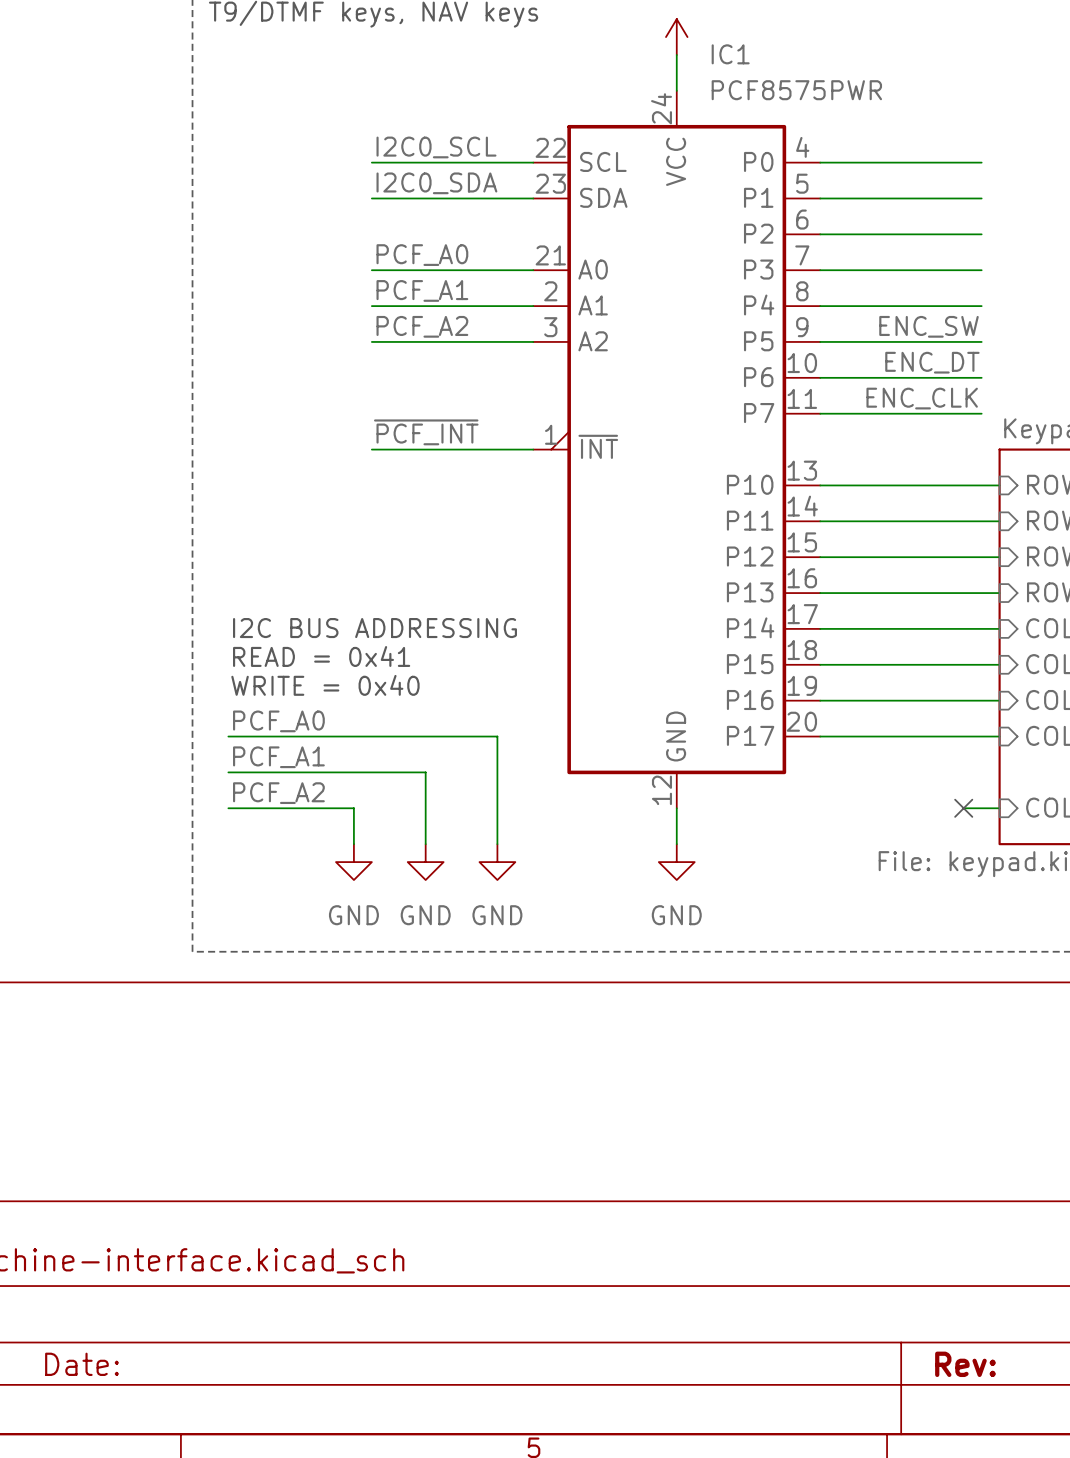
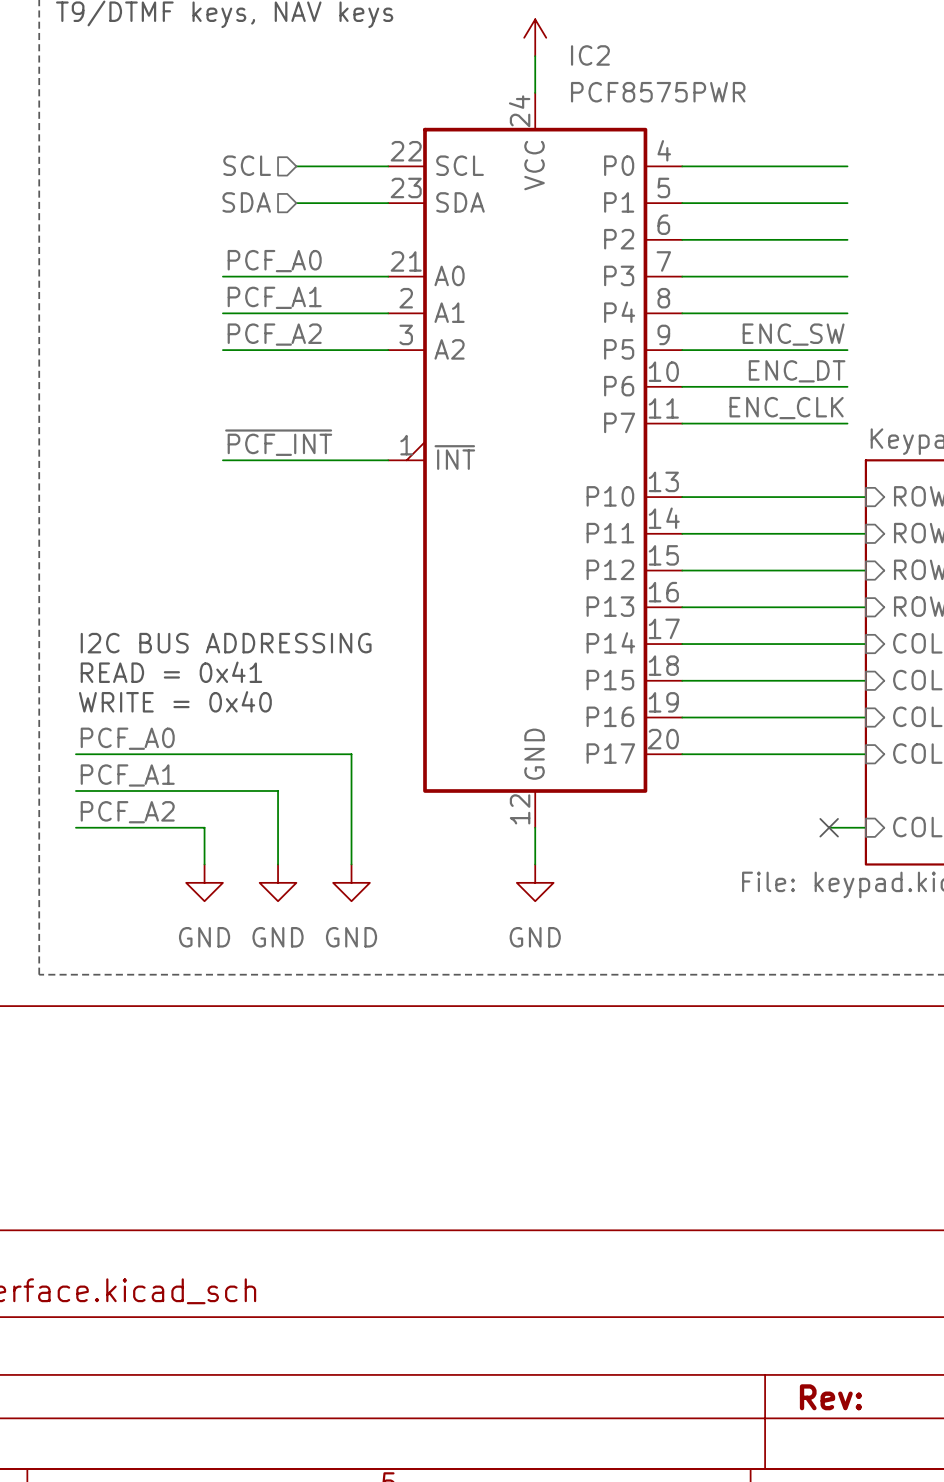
IC1 name: IC1 (730, 54) -> IC2 (590, 55)
label: I2C0_SCL (436, 147) -> none
hierarchical label: none -> SCL (247, 165)
wire: (371, 162) (443, 162) -> none
label: I2C0_SDA (436, 183) -> none
hierarchical label: none -> SDA (246, 202)
wire: (371, 198) (443, 198) -> none

